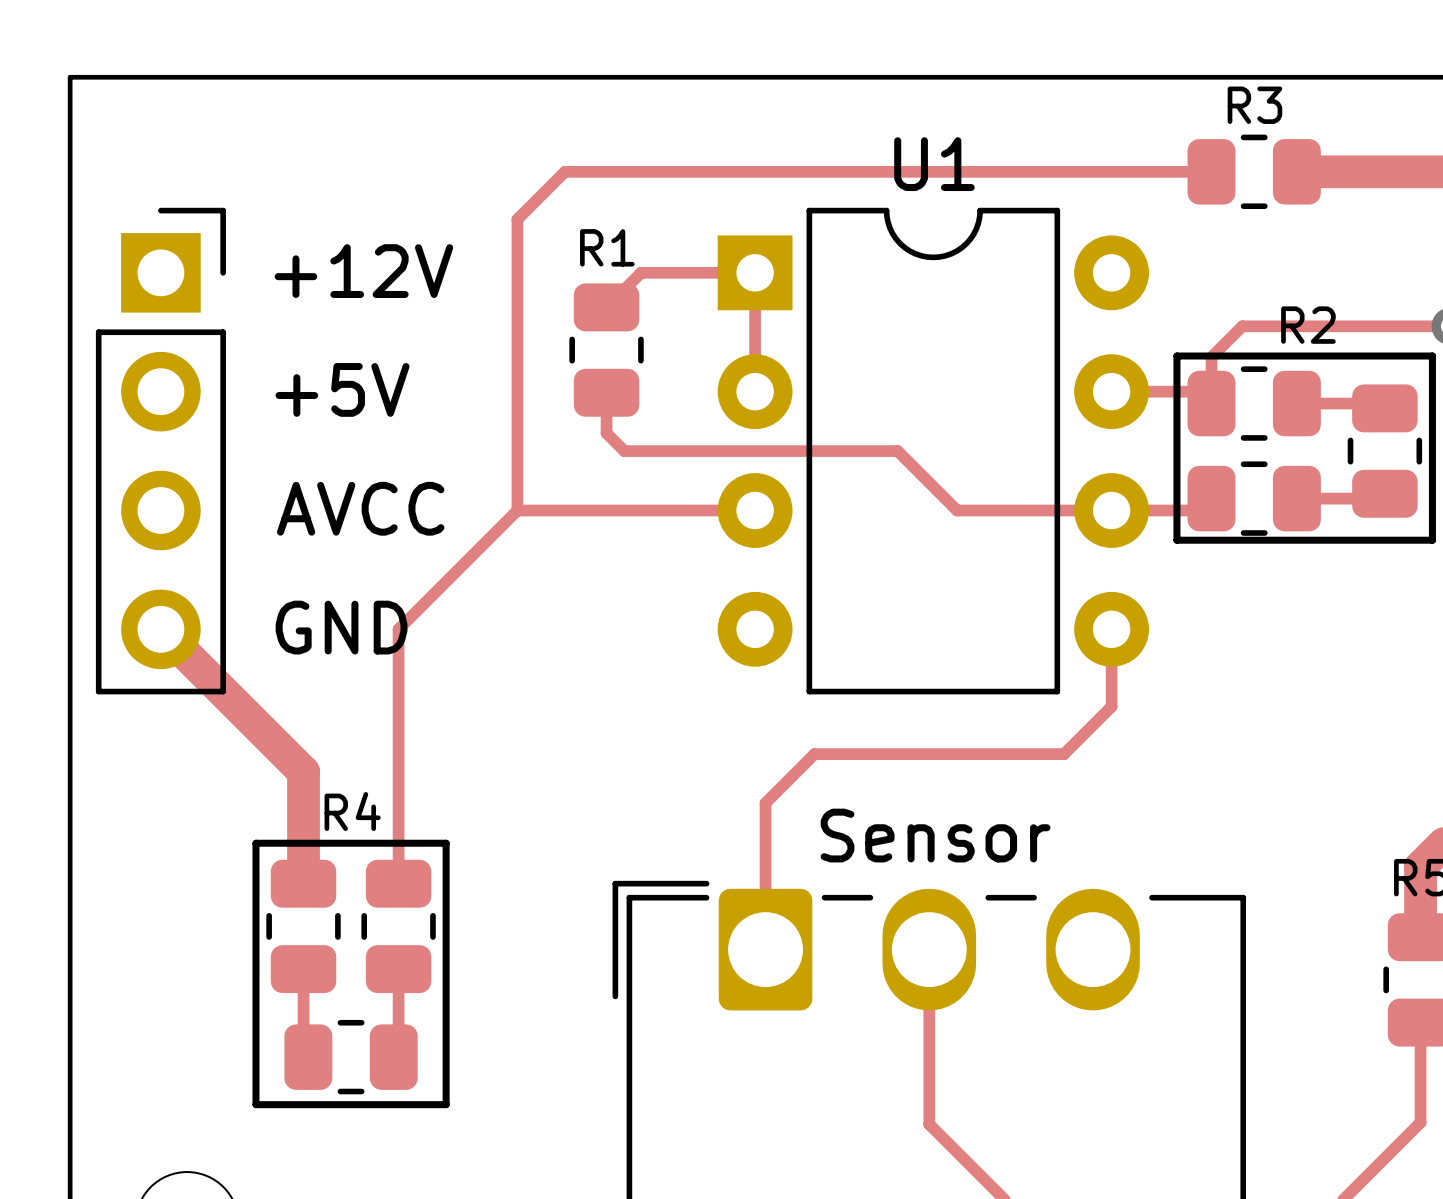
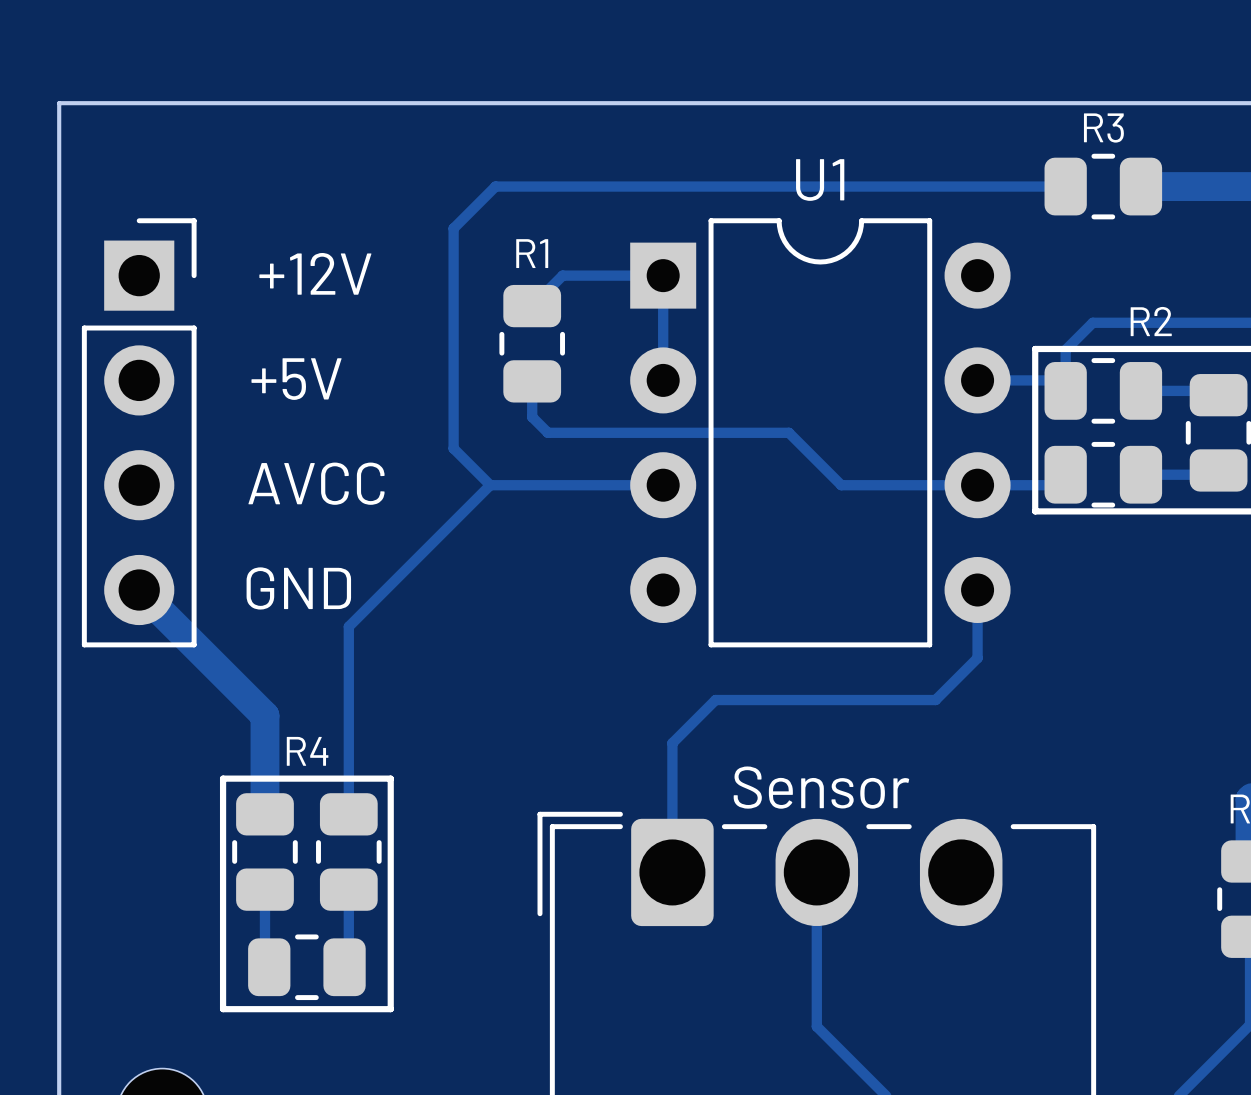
track: (517, 468) (517, 510) -> none
track: (517, 510) (398, 629) (398, 670) -> (453, 448) (490, 485) (348, 626)
track: (517, 510) (559, 510) -> none
text position: Sensor (935, 835) -> Sensor (821, 787)

